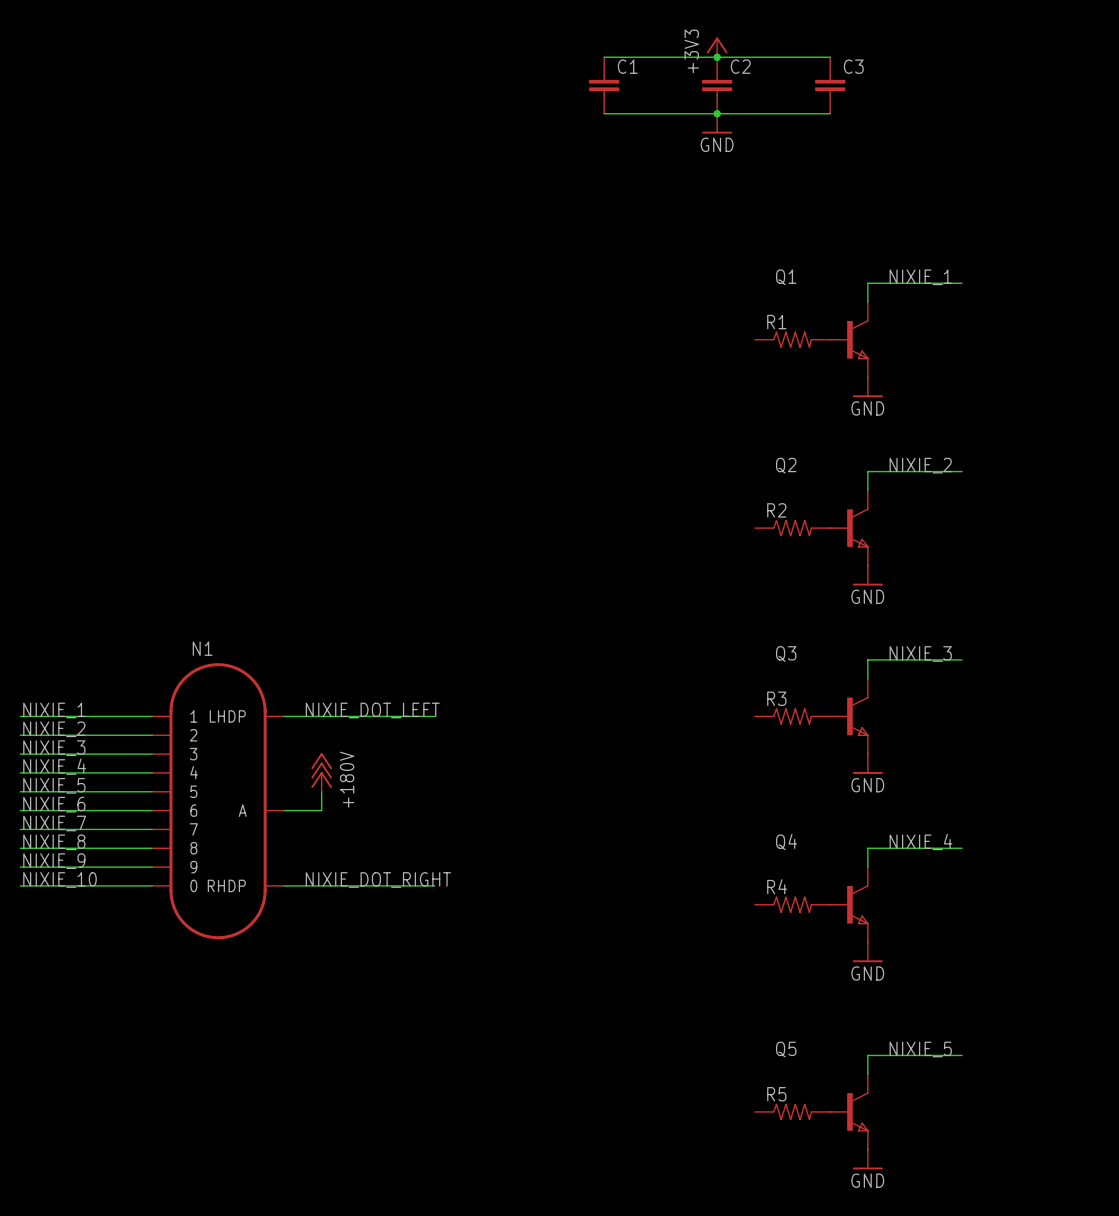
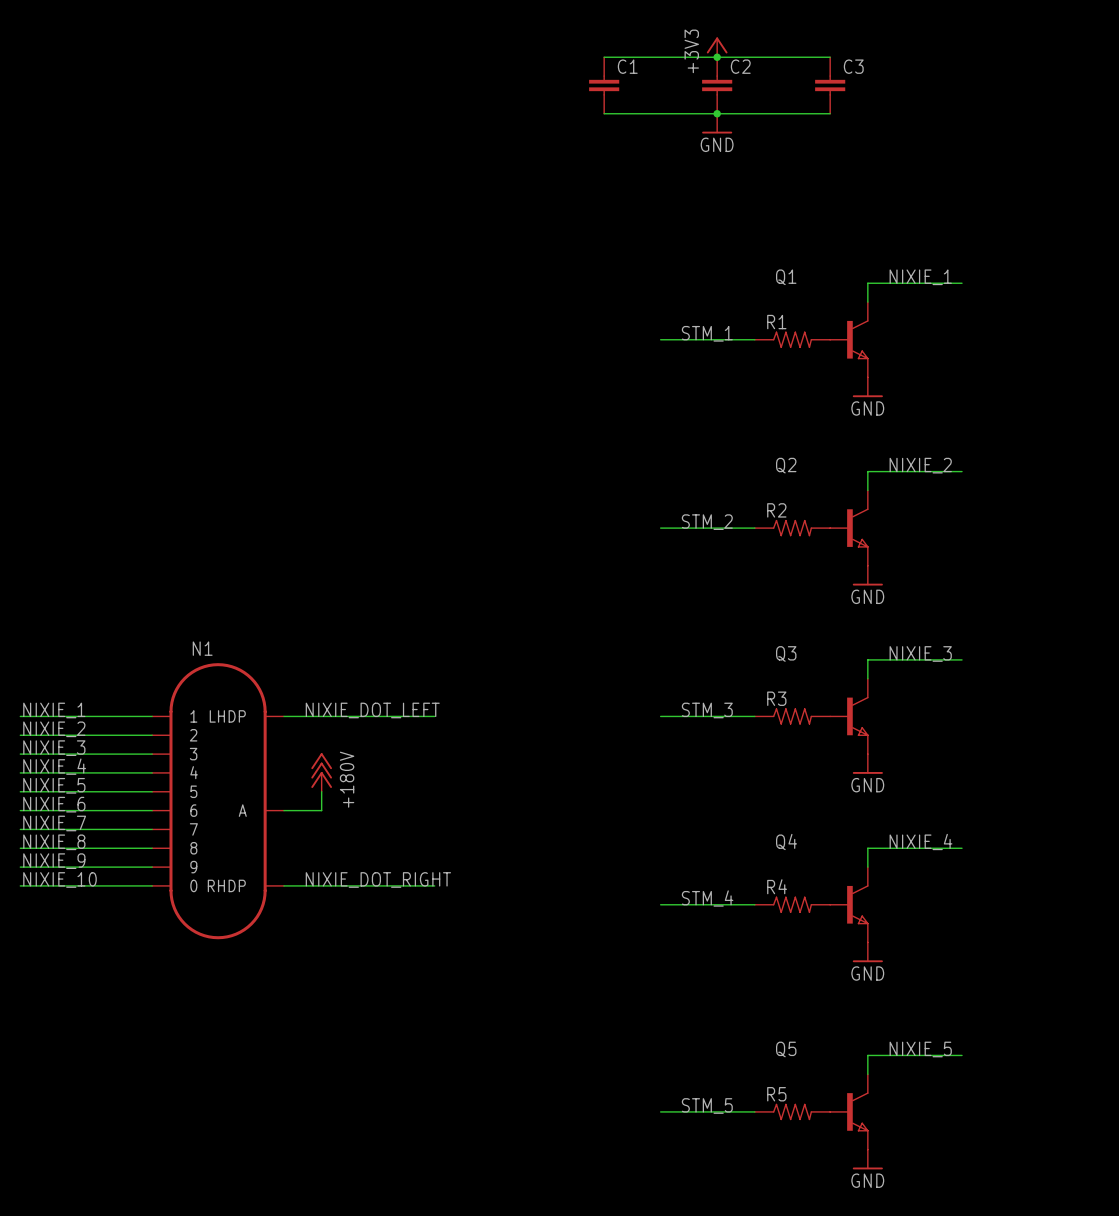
label: none -> STM_1 (707, 333)
wire: none -> (660, 339) (754, 339)
label: none -> STM_2 (707, 522)
wire: none -> (660, 528) (754, 528)
label: none -> STM_3 (707, 710)
wire: none -> (660, 716) (754, 716)
label: none -> STM_4 (707, 898)
wire: none -> (660, 904) (754, 904)
label: none -> STM_5 (707, 1105)
wire: none -> (660, 1111) (754, 1111)

